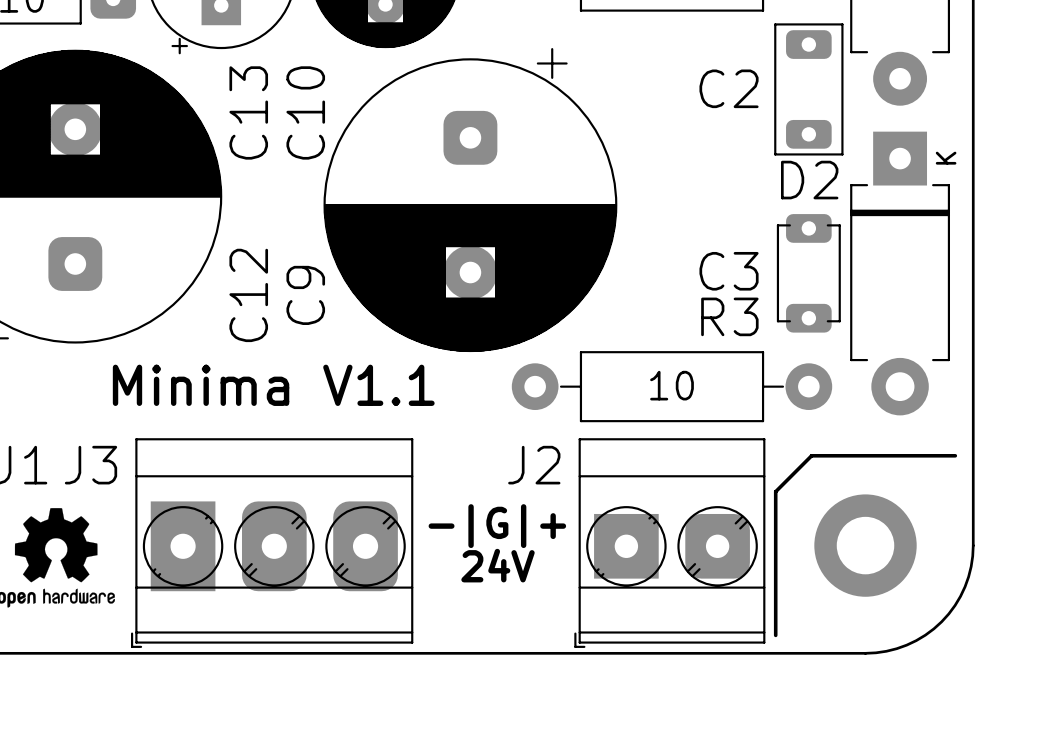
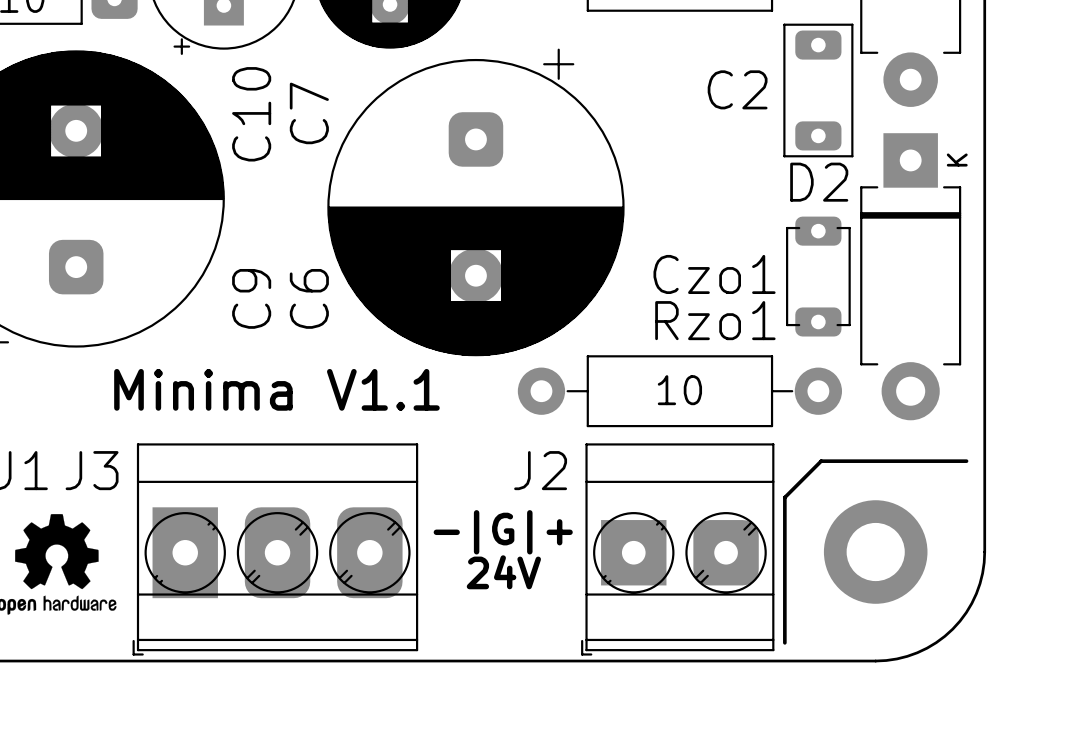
C13 name: C13 (248, 112) -> C10 (251, 114)
C10 name: C10 (305, 112) -> C7 (309, 113)
C3 name: C3 (729, 271) -> Czo1 (714, 274)
C12 name: C12 (248, 295) -> C9 (251, 298)
C9 name: C9 (305, 295) -> C6 (309, 298)
R3 name: R3 (729, 316) -> Rzo1 (715, 320)

